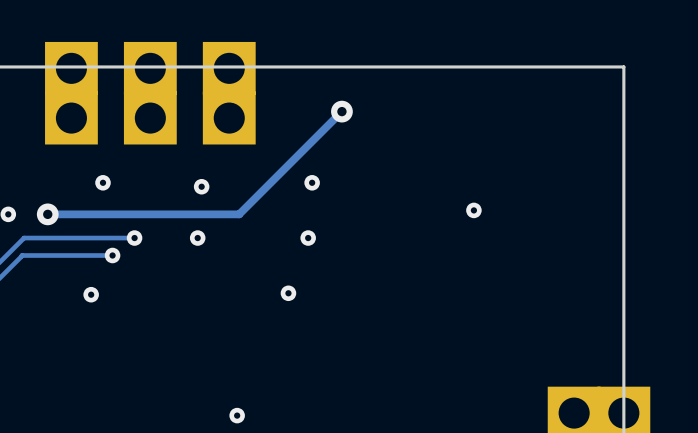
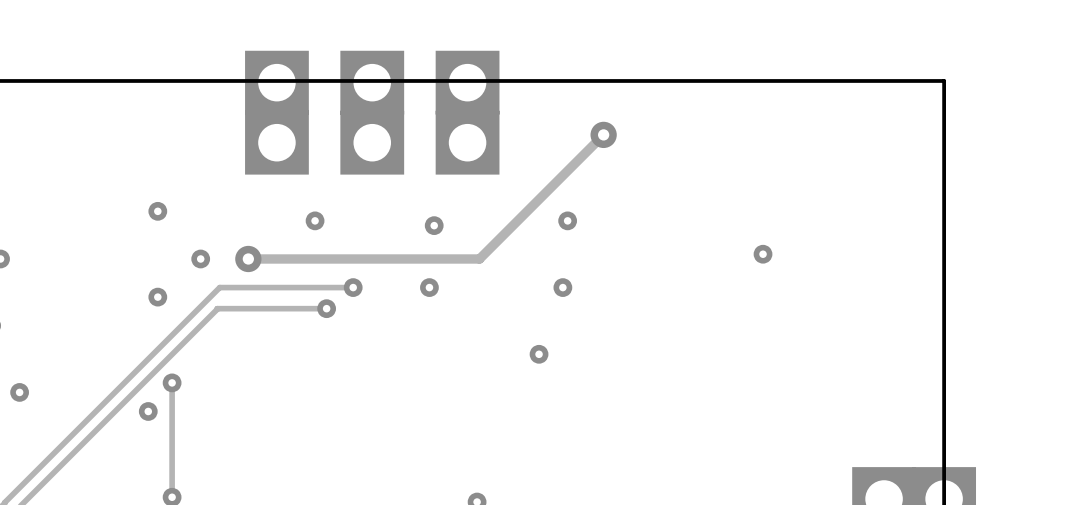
via: (91, 294) -> none

